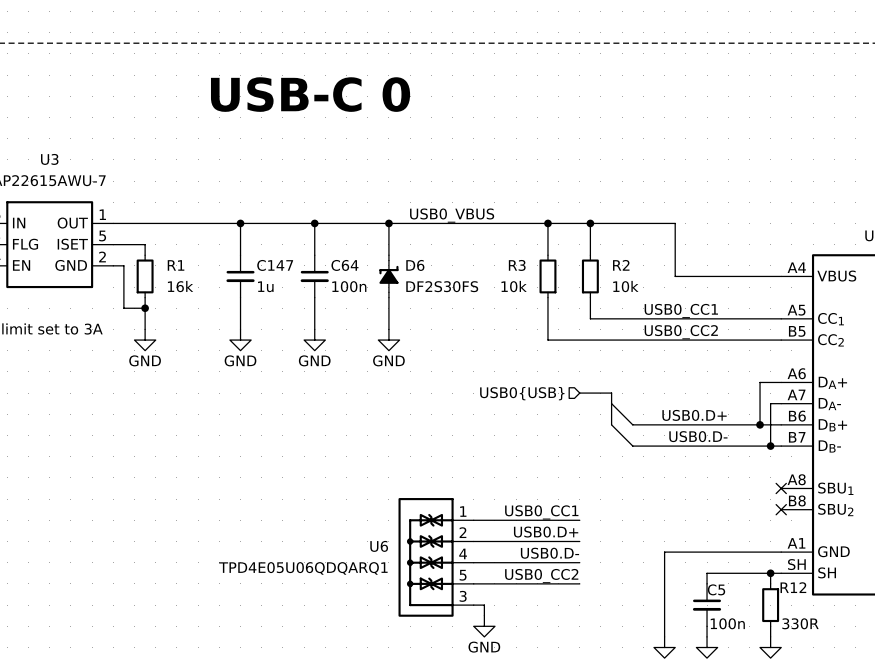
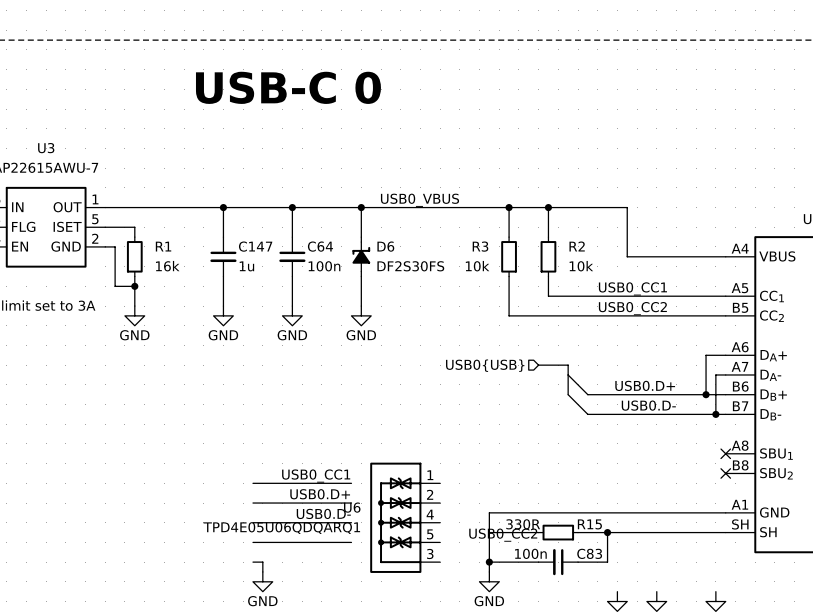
label position: USB0_CC1 (541, 512) -> USB0_CC1 (316, 476)
wire: (473, 520) (579, 520) -> (252, 483) (351, 483)
label position: USB0.D+ (546, 532) -> USB0.D+ (320, 494)
wire: (473, 541) (579, 541) -> (252, 503) (351, 503)
wire: (664, 552) (664, 636) -> (617, 512) (489, 512) (489, 571)
label position: USB0.D- (549, 553) -> USB0.D- (323, 513)
wire: (473, 562) (579, 562) -> (252, 522) (351, 522)
wire: none -> (489, 532) (538, 532)
R15: none -> (558, 532)
wire: none -> (607, 532) (607, 562) (578, 562)
junction: none -> (607, 532)
wire: (707, 573) (707, 583) -> (656, 532) (578, 532)
wire: (770, 573) (770, 583) -> none
junction: (770, 573) -> none
wire: (473, 583) (579, 583) -> (252, 542) (351, 542)
wire: (473, 605) (484, 605) (484, 615) -> (252, 562) (262, 562) (262, 571)
wire: none -> (489, 562) (538, 562)
junction: none -> (489, 562)
C83: none -> (558, 562)
C5: (707, 605) -> none
R12: (770, 605) -> none
power symbol: none -> GND (262, 581)
power symbol position: GND (484, 626) -> GND (489, 581)
wire: (707, 626) (707, 636) -> none
wire: (770, 626) (770, 636) -> none

